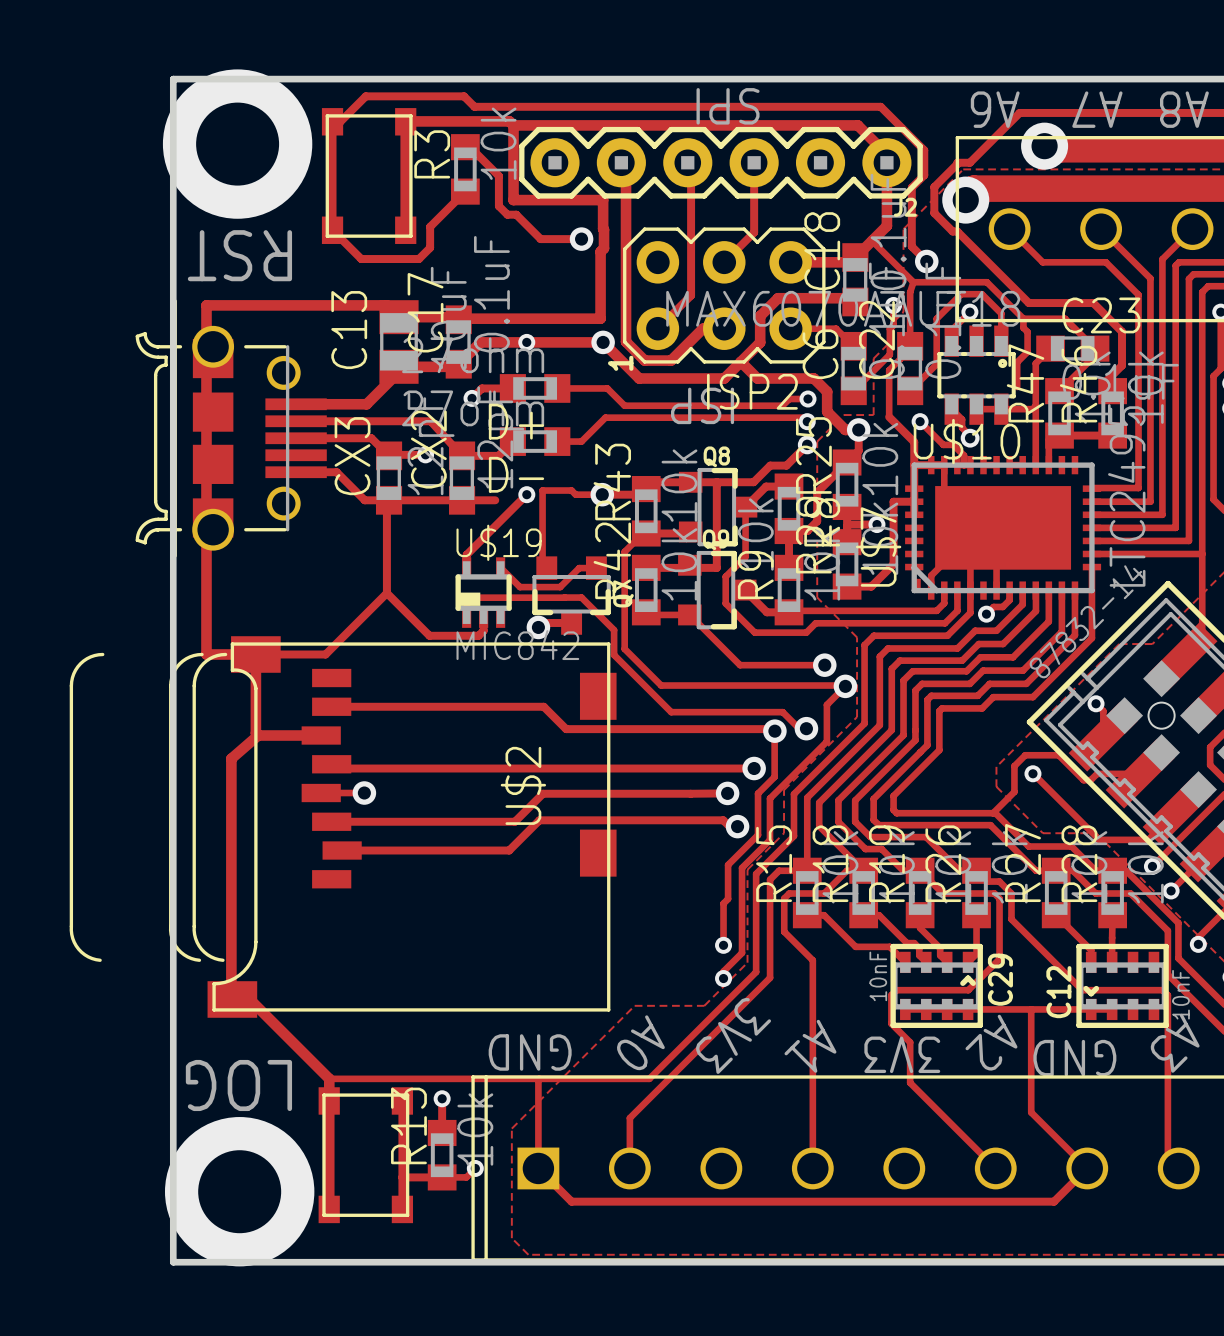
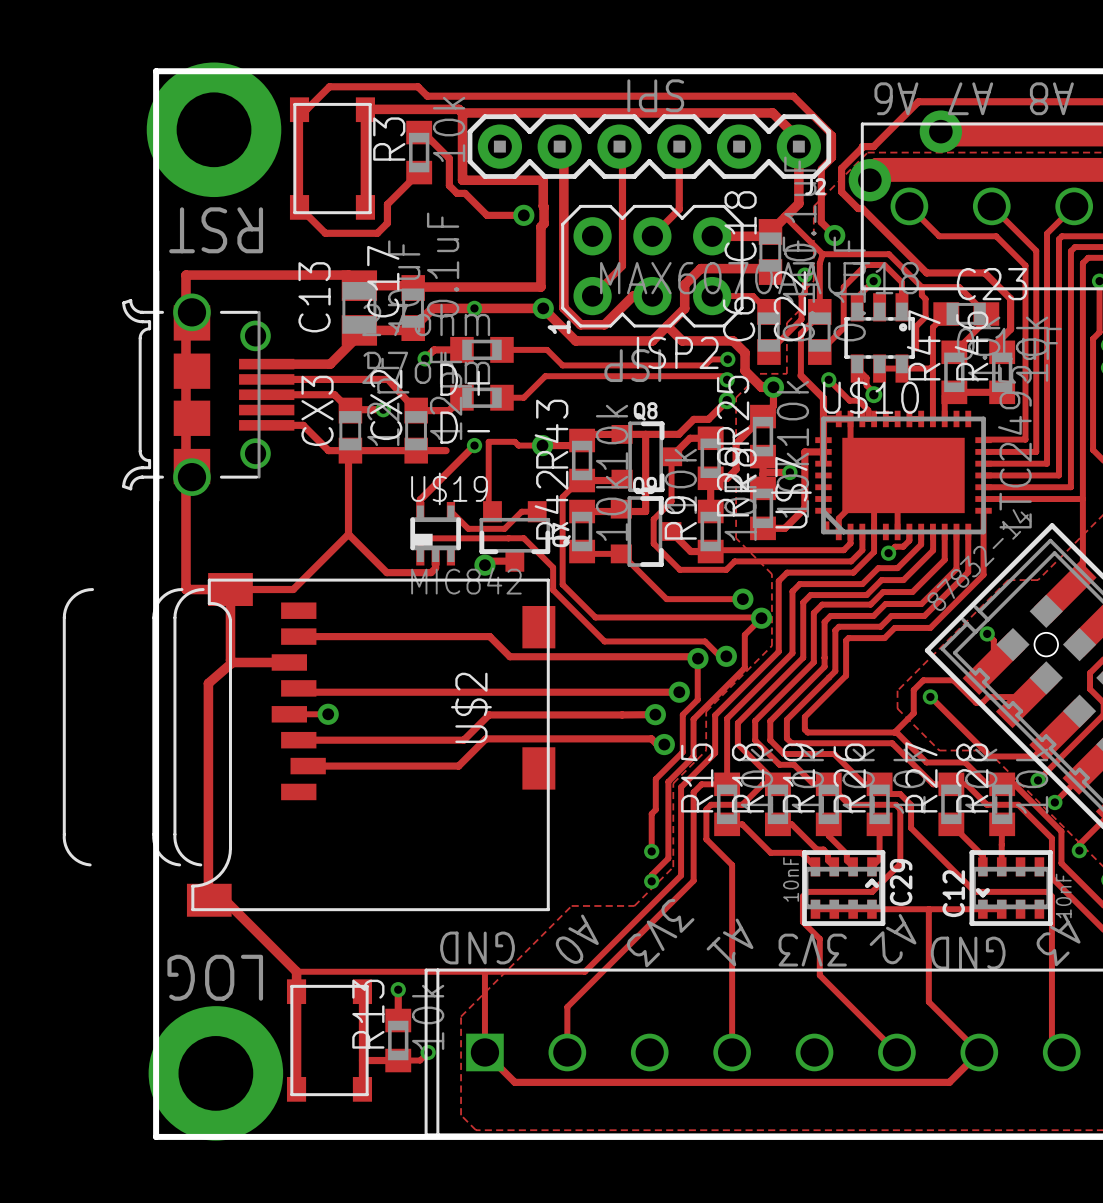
text position: A7 (1097, 109) -> A7 (970, 98)
text position: A8 (1184, 109) -> A8 (1051, 98)

